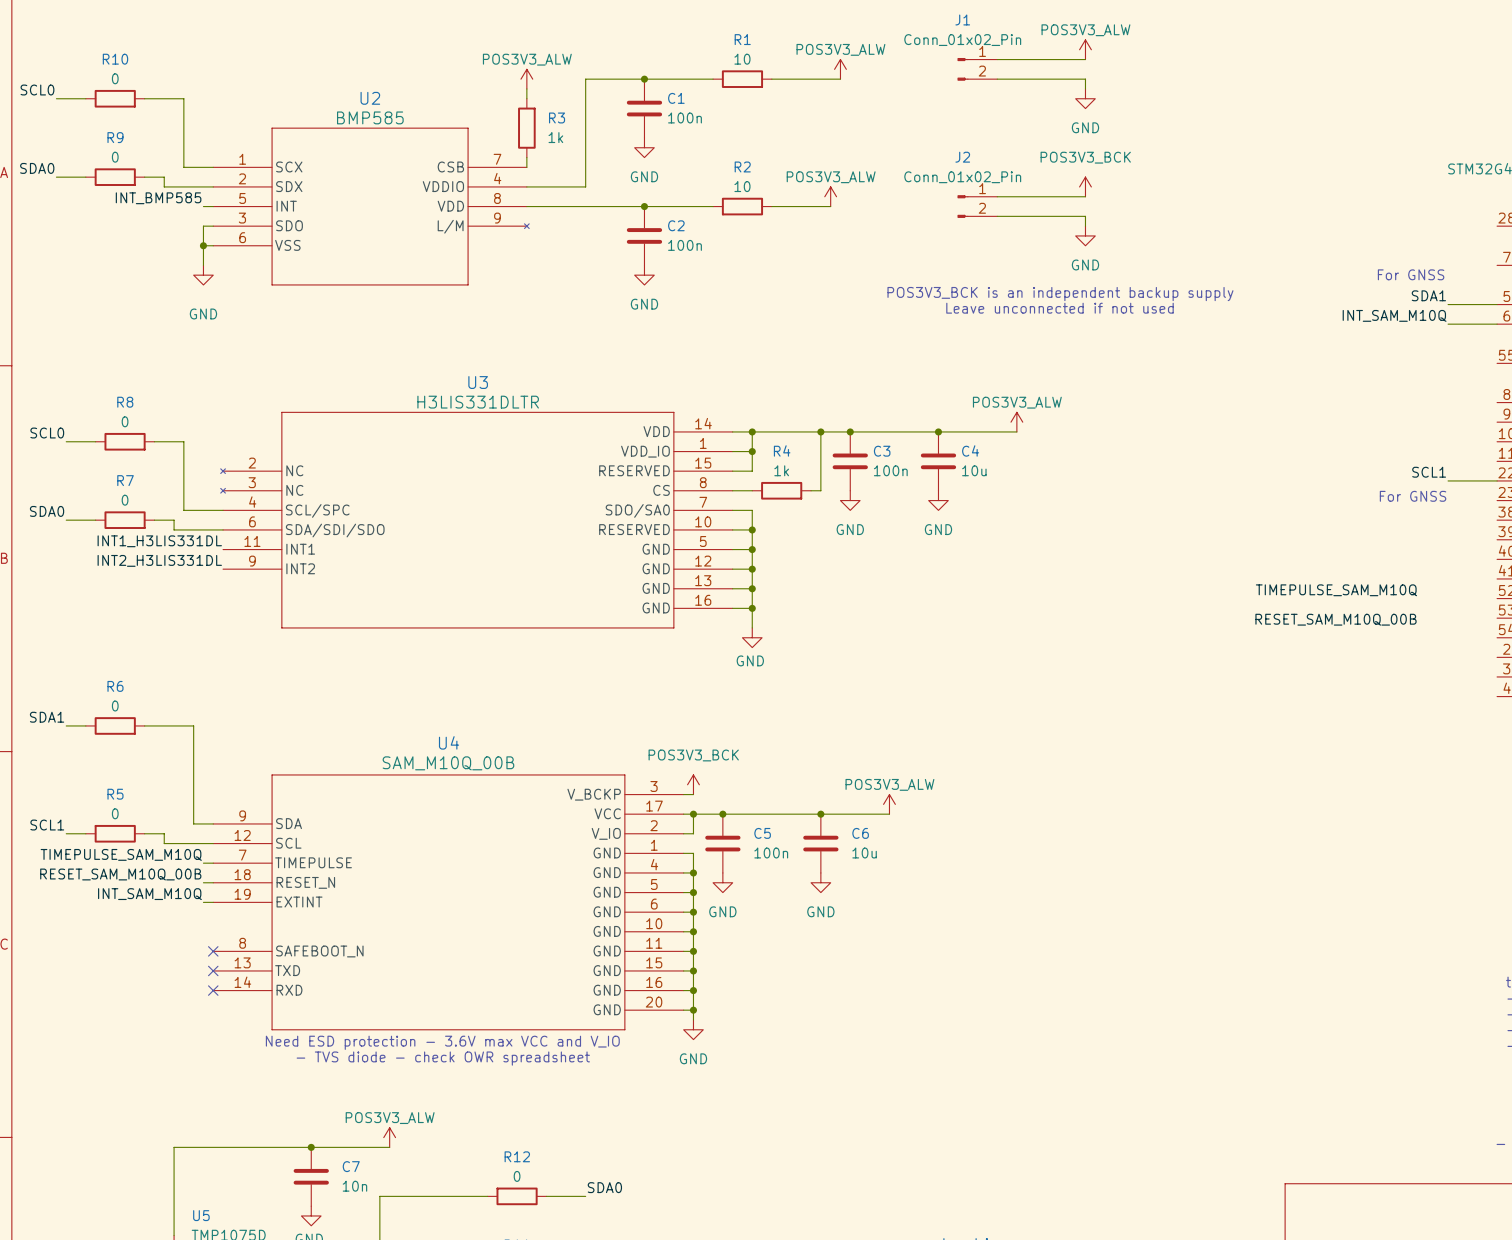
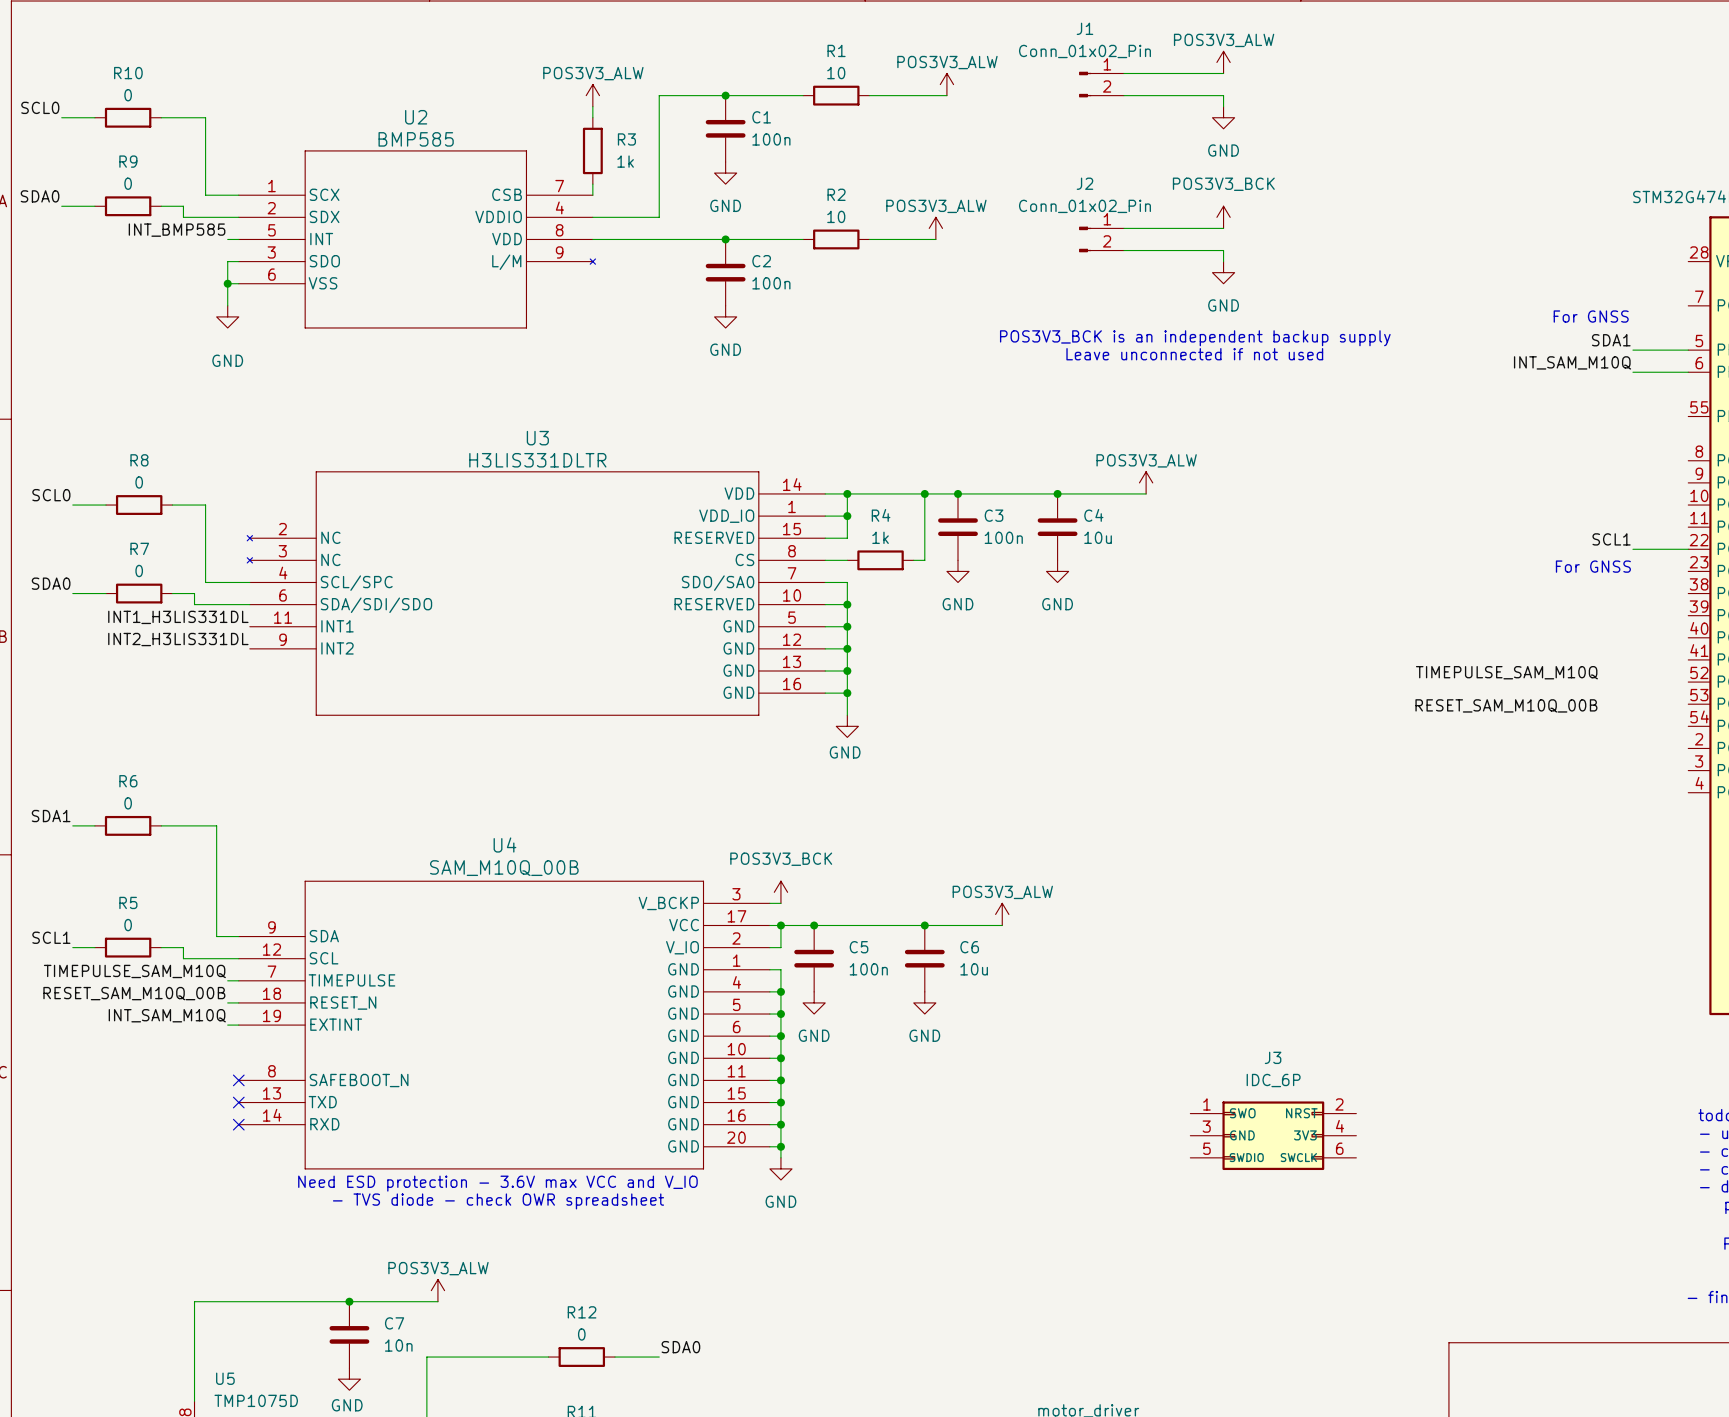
J3: none -> IDC_6P (1273, 1135)

